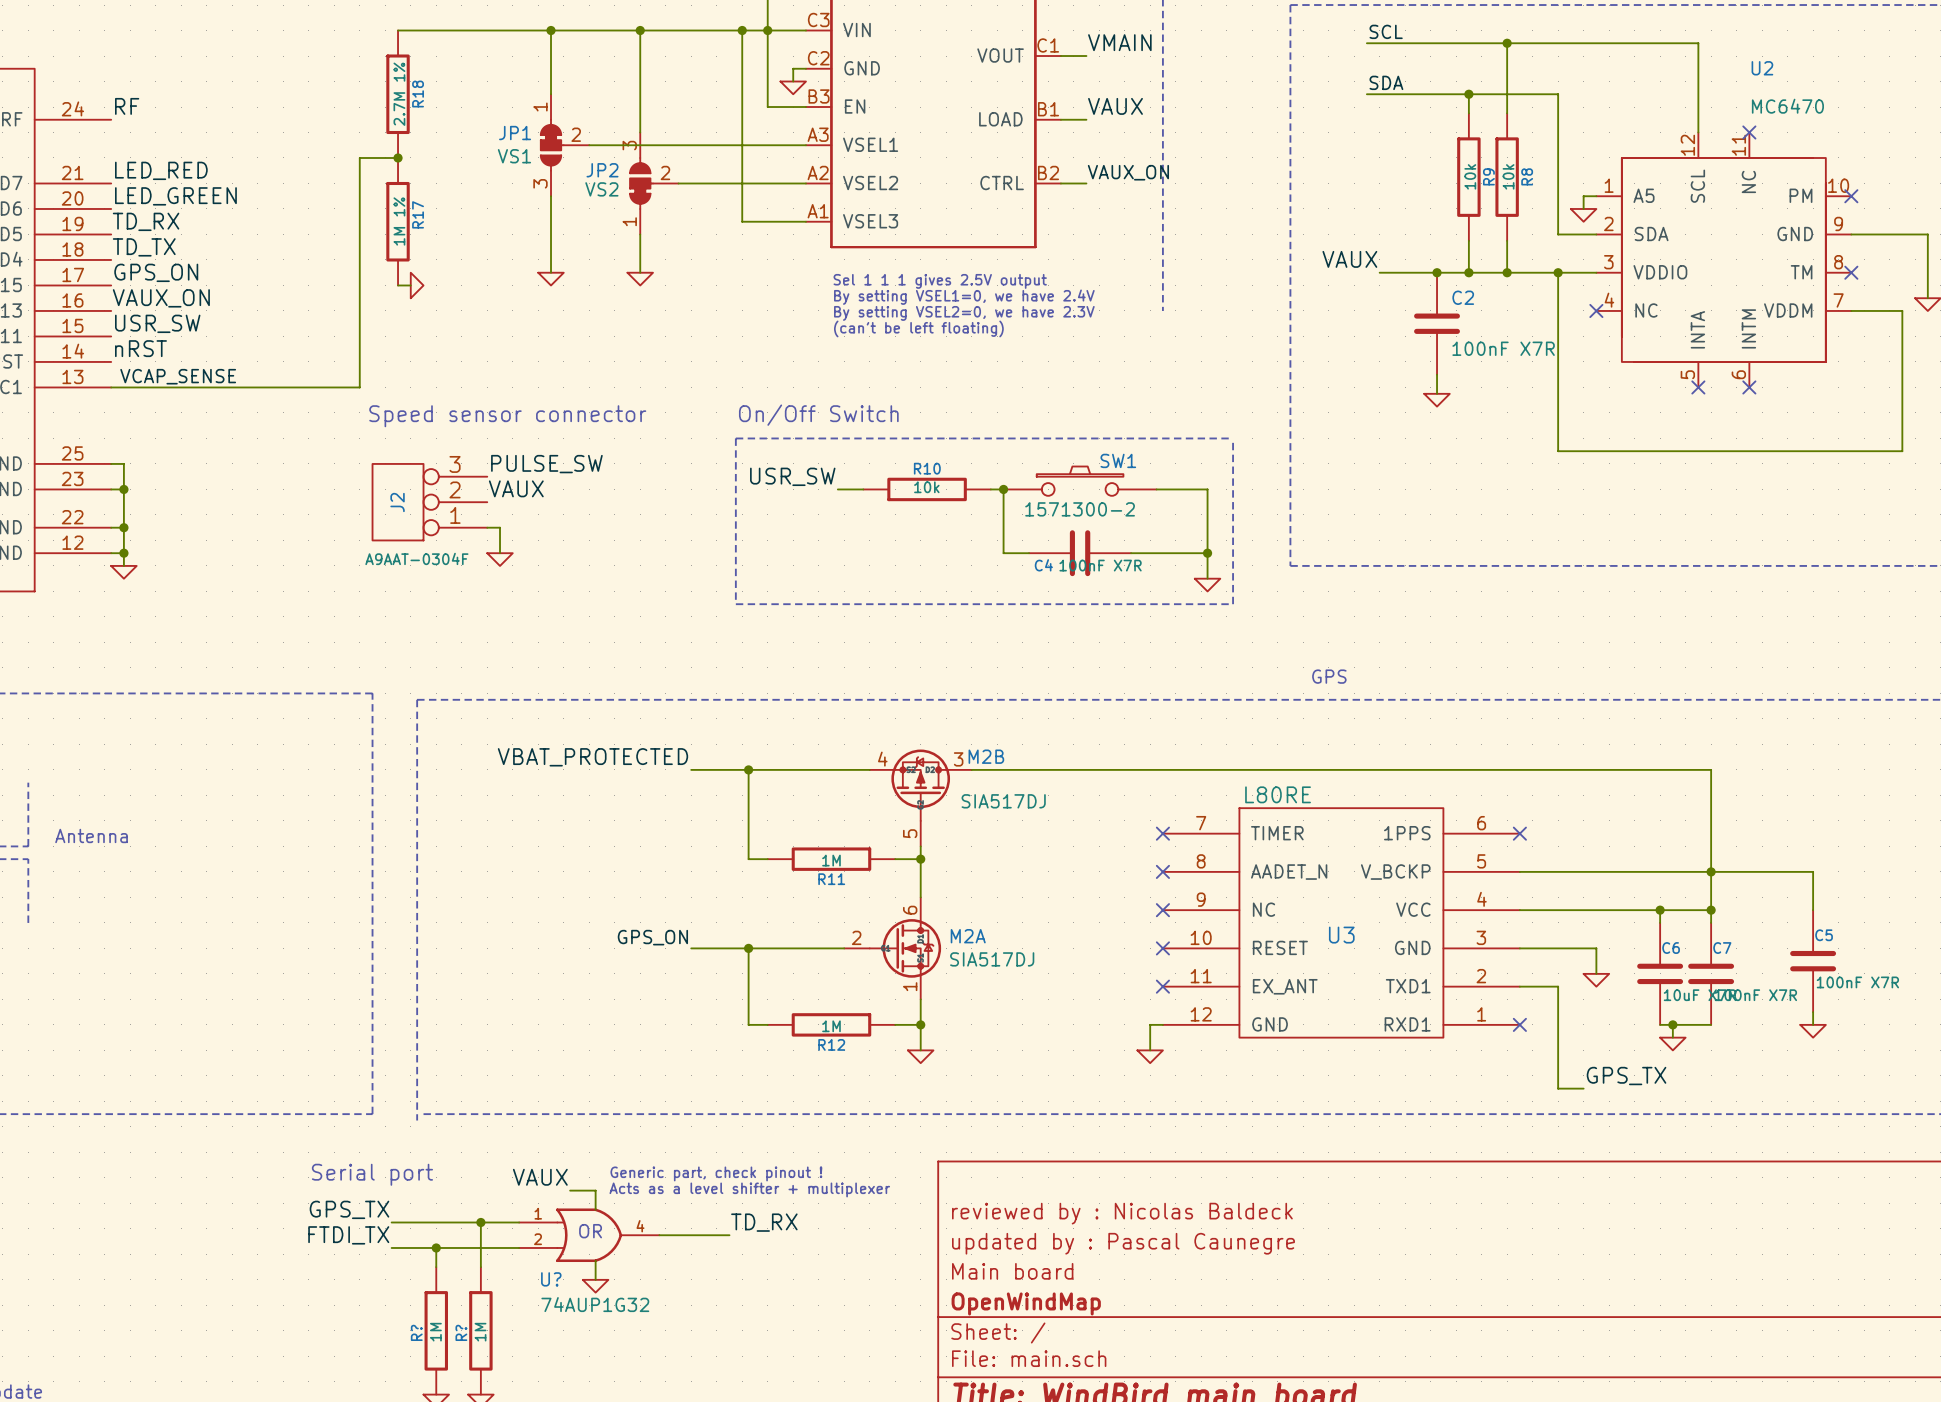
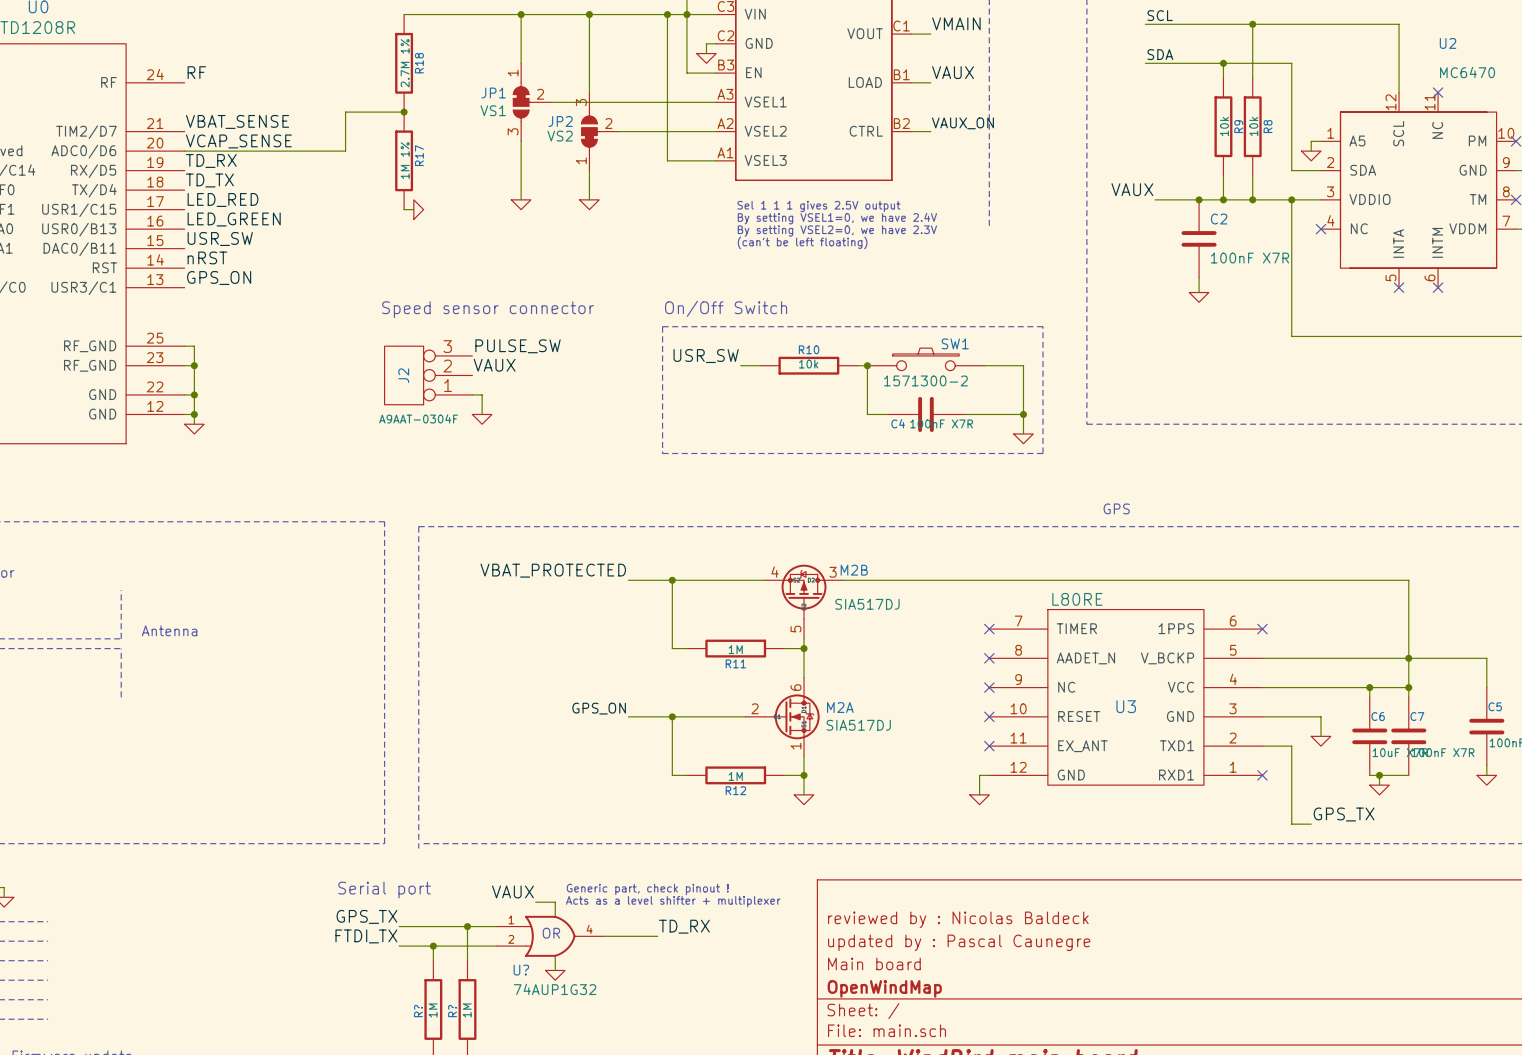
wire: (359, 157) (359, 387) (111, 387) -> (374, 112) (345, 112) (345, 151) (184, 151)
label: LED_RED (161, 170) -> VBAT_SENSE (237, 121)
label: LED_GREEN (175, 196) -> VCAP_SENSE (238, 141)
label: GPS_ON (156, 272) -> LED_RED (223, 199)
label: VAUX_ON (161, 298) -> LED_GREEN (234, 219)
label: none -> GPS_ON (219, 278)
label: VCAP_SENSE (178, 376) -> none

